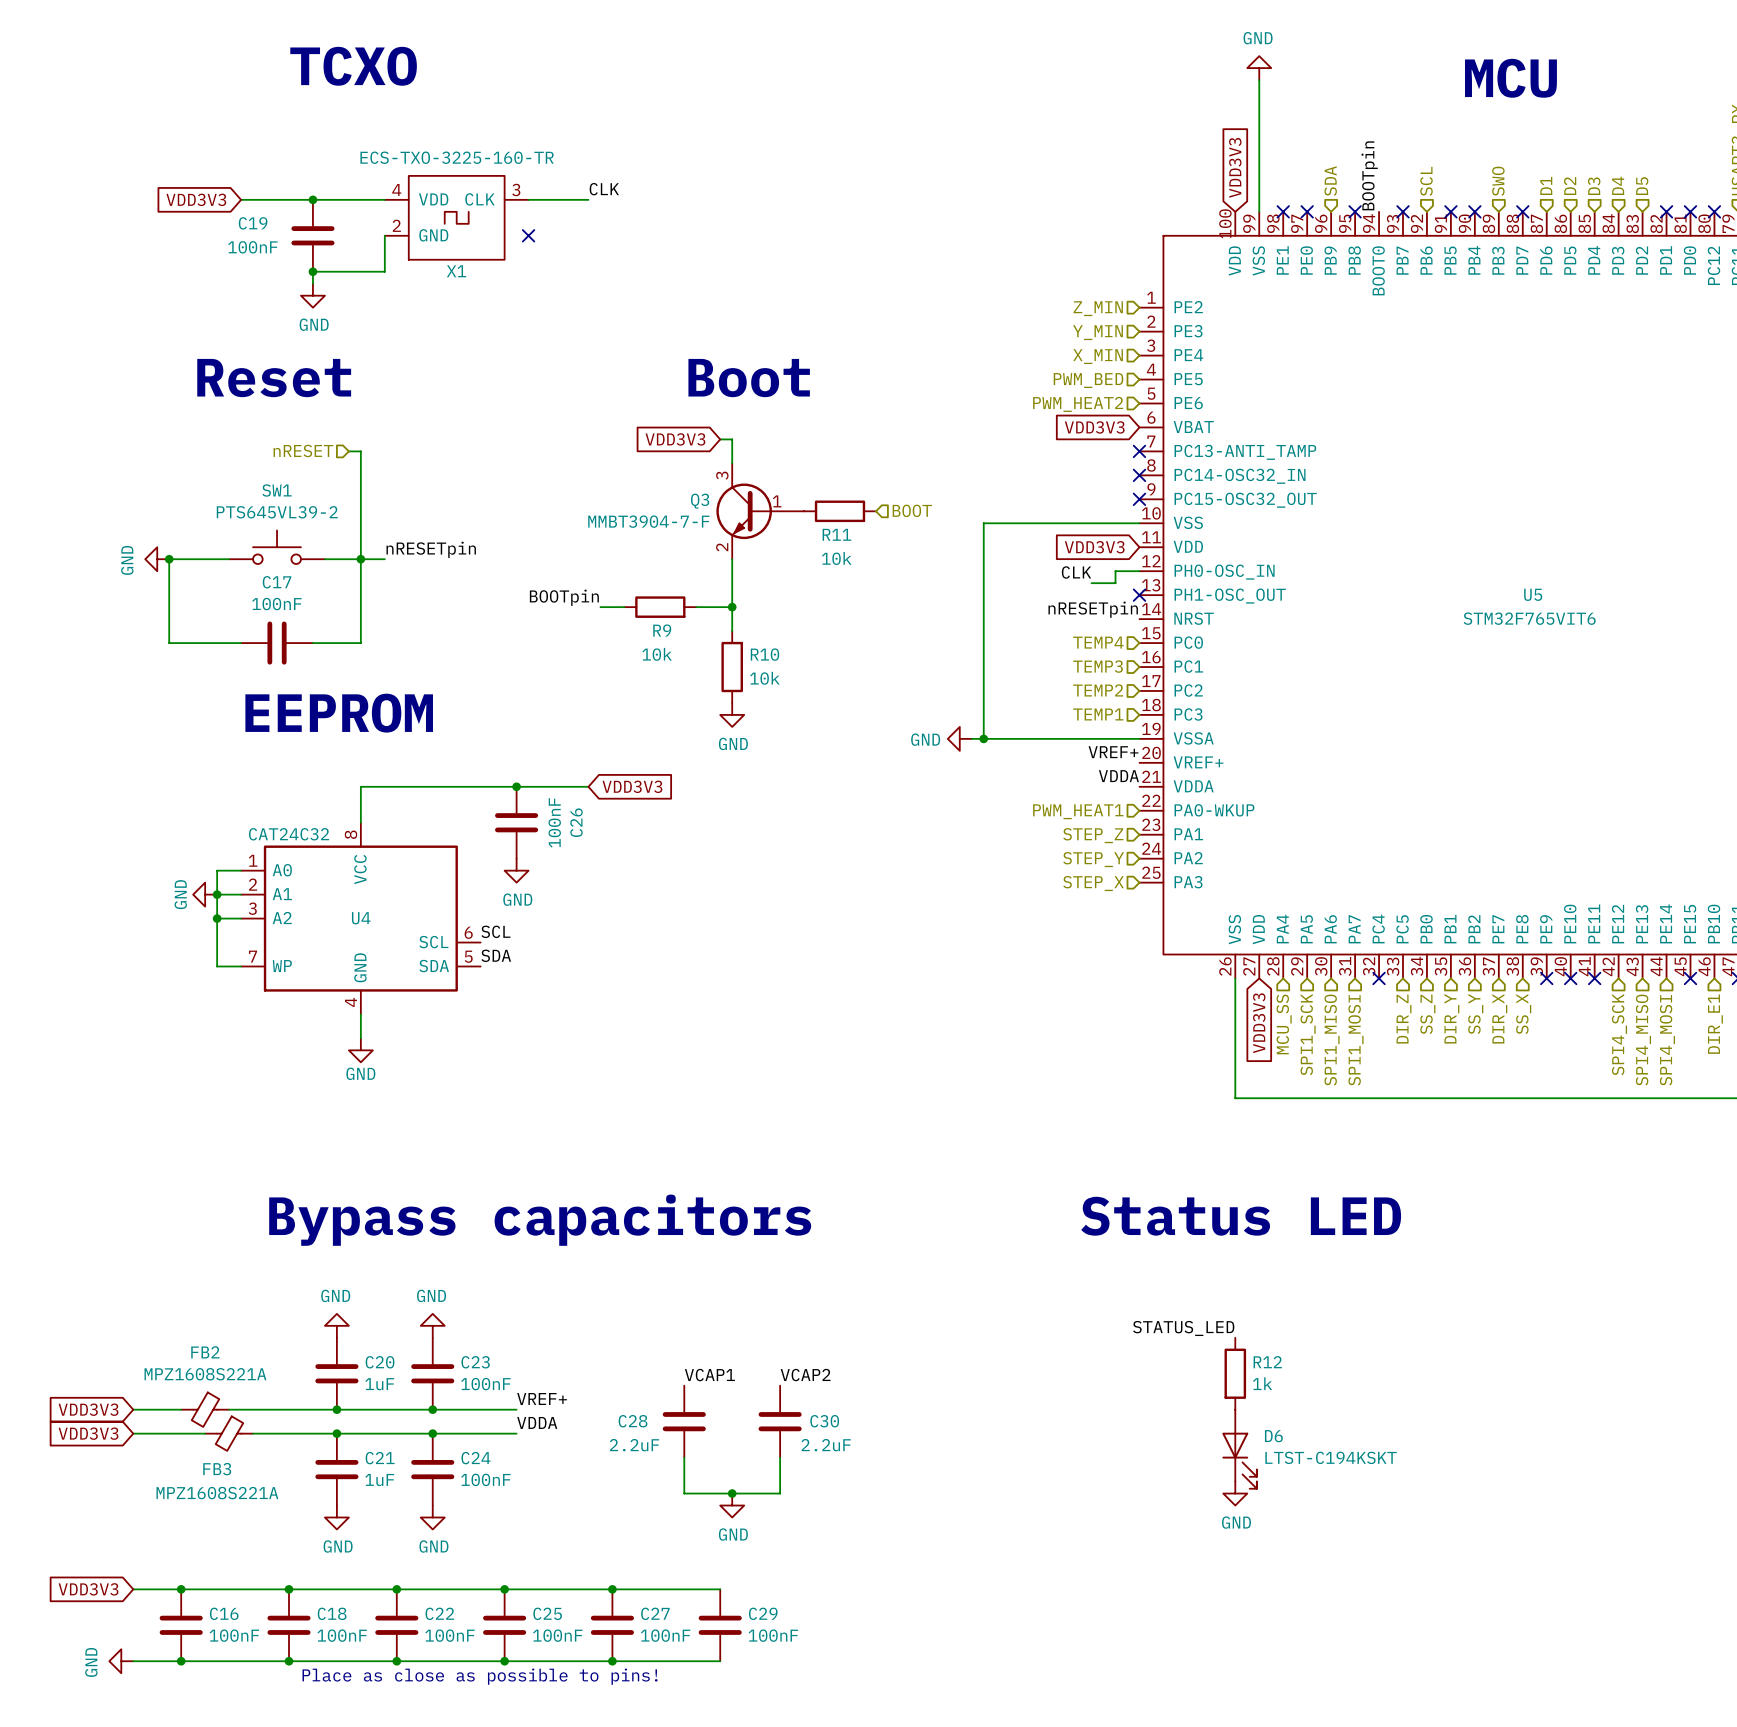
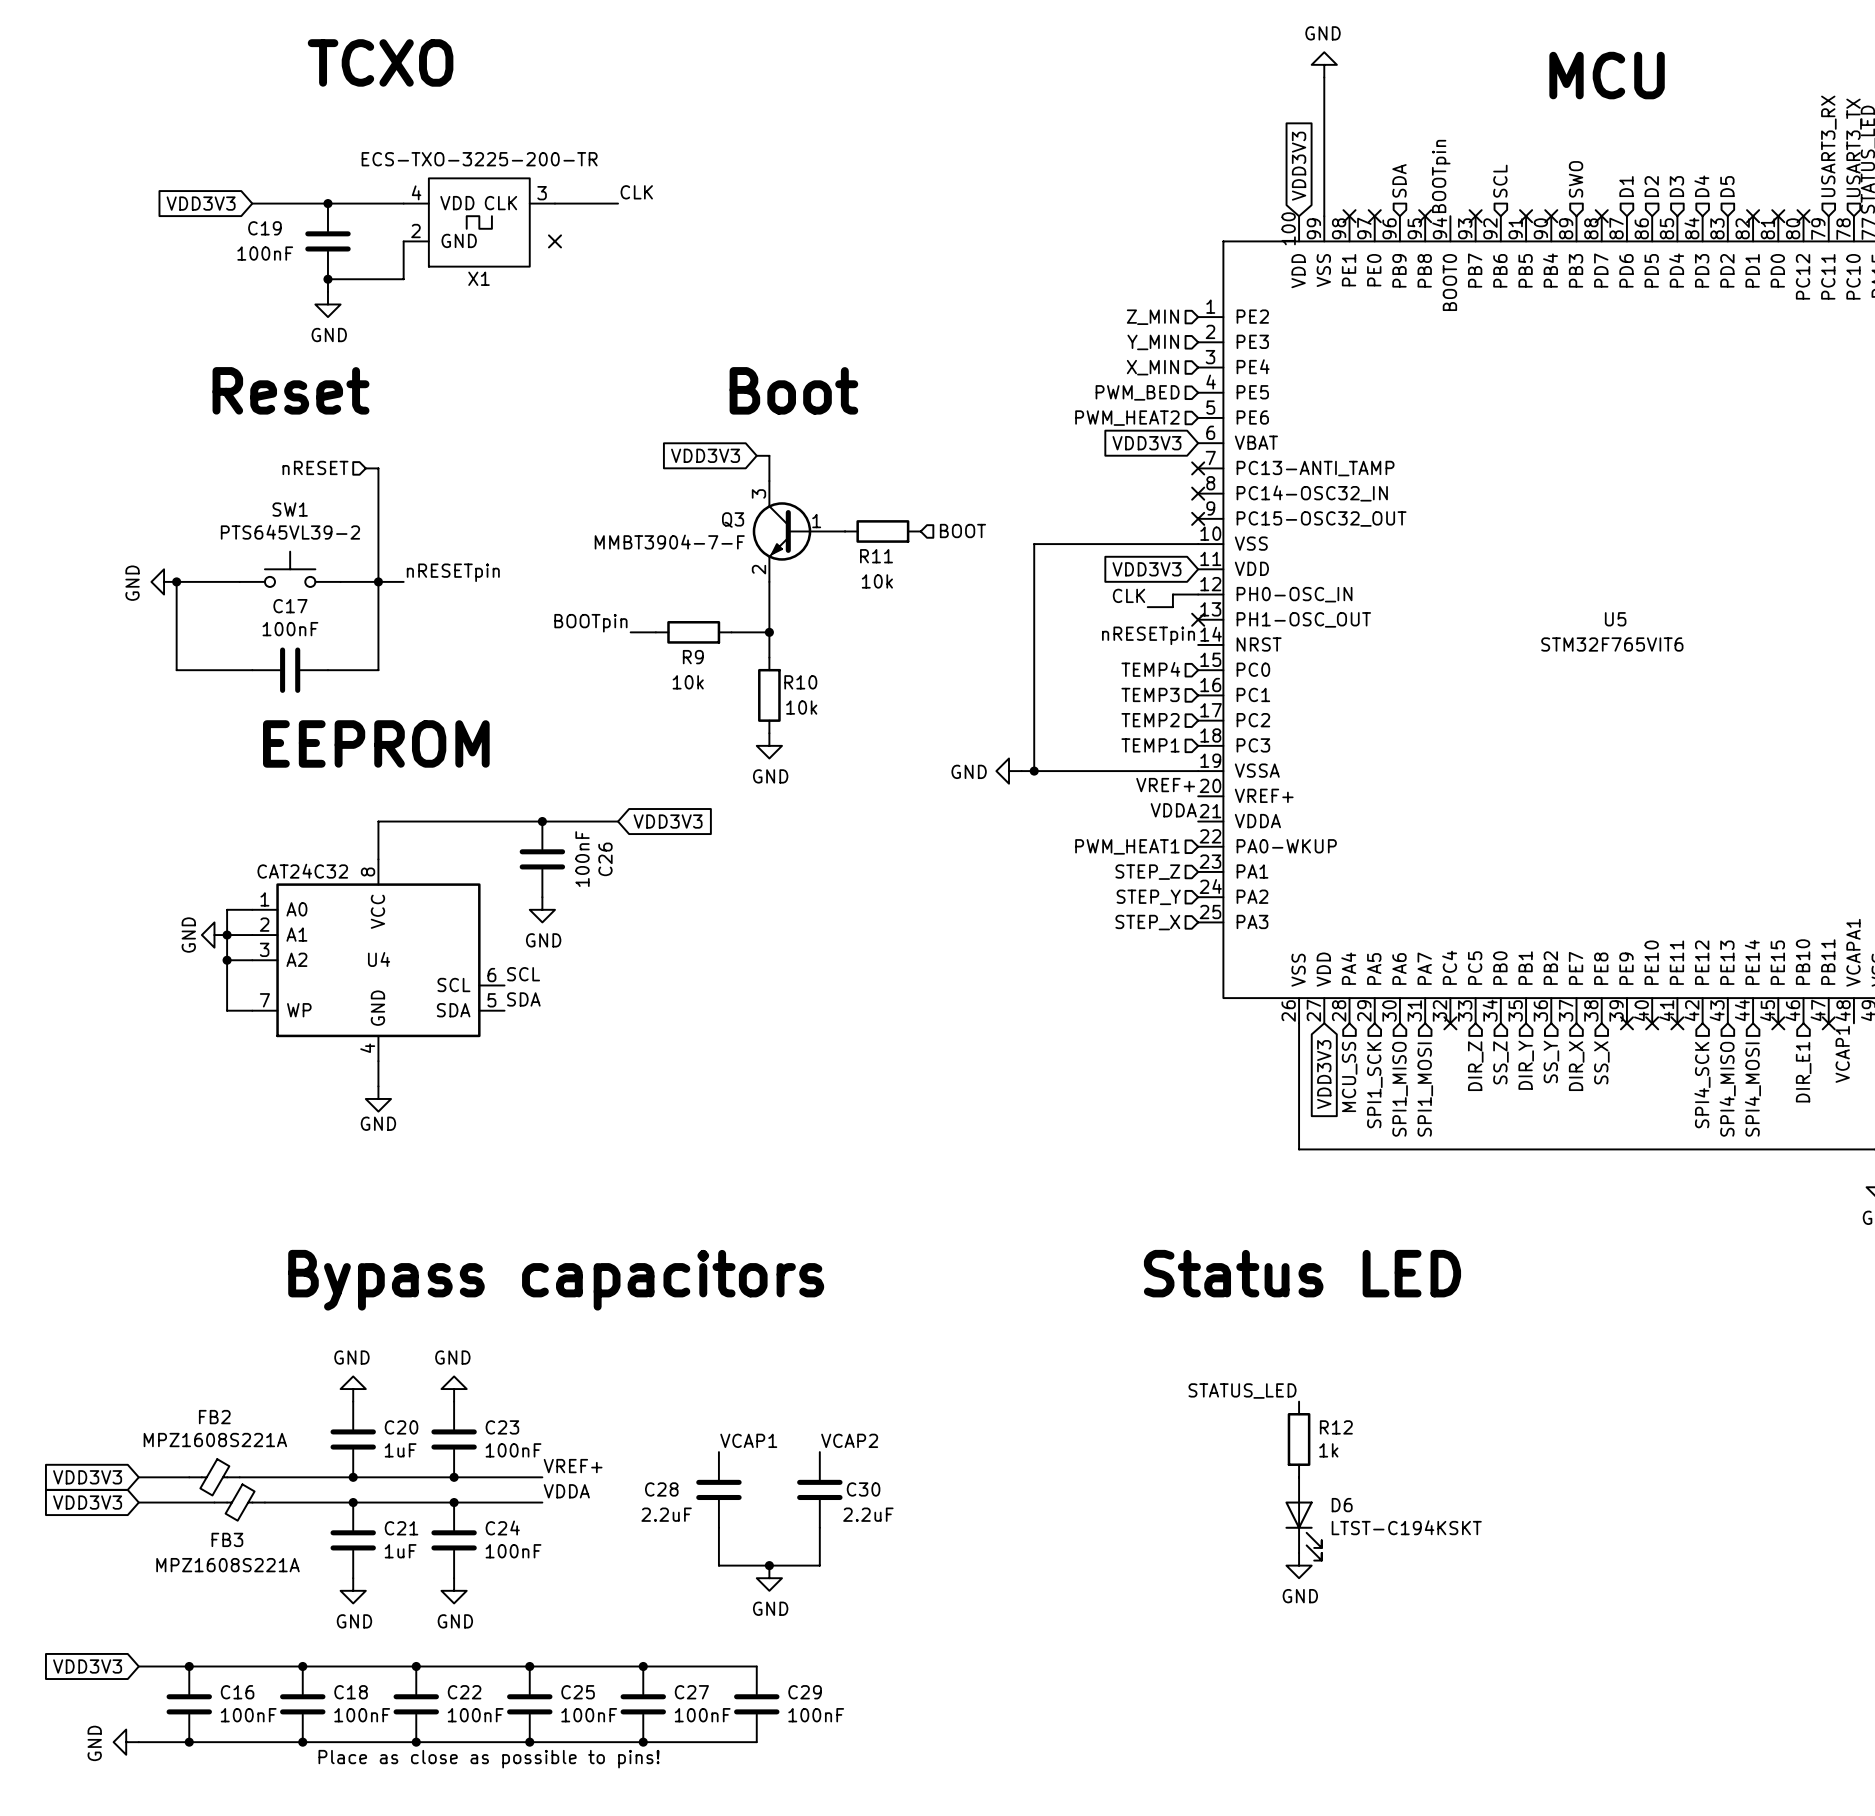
X1 value: ECS-TXO-3225-160-TR (457, 157) -> ECS-TXO-3225-200-TR (479, 159)

